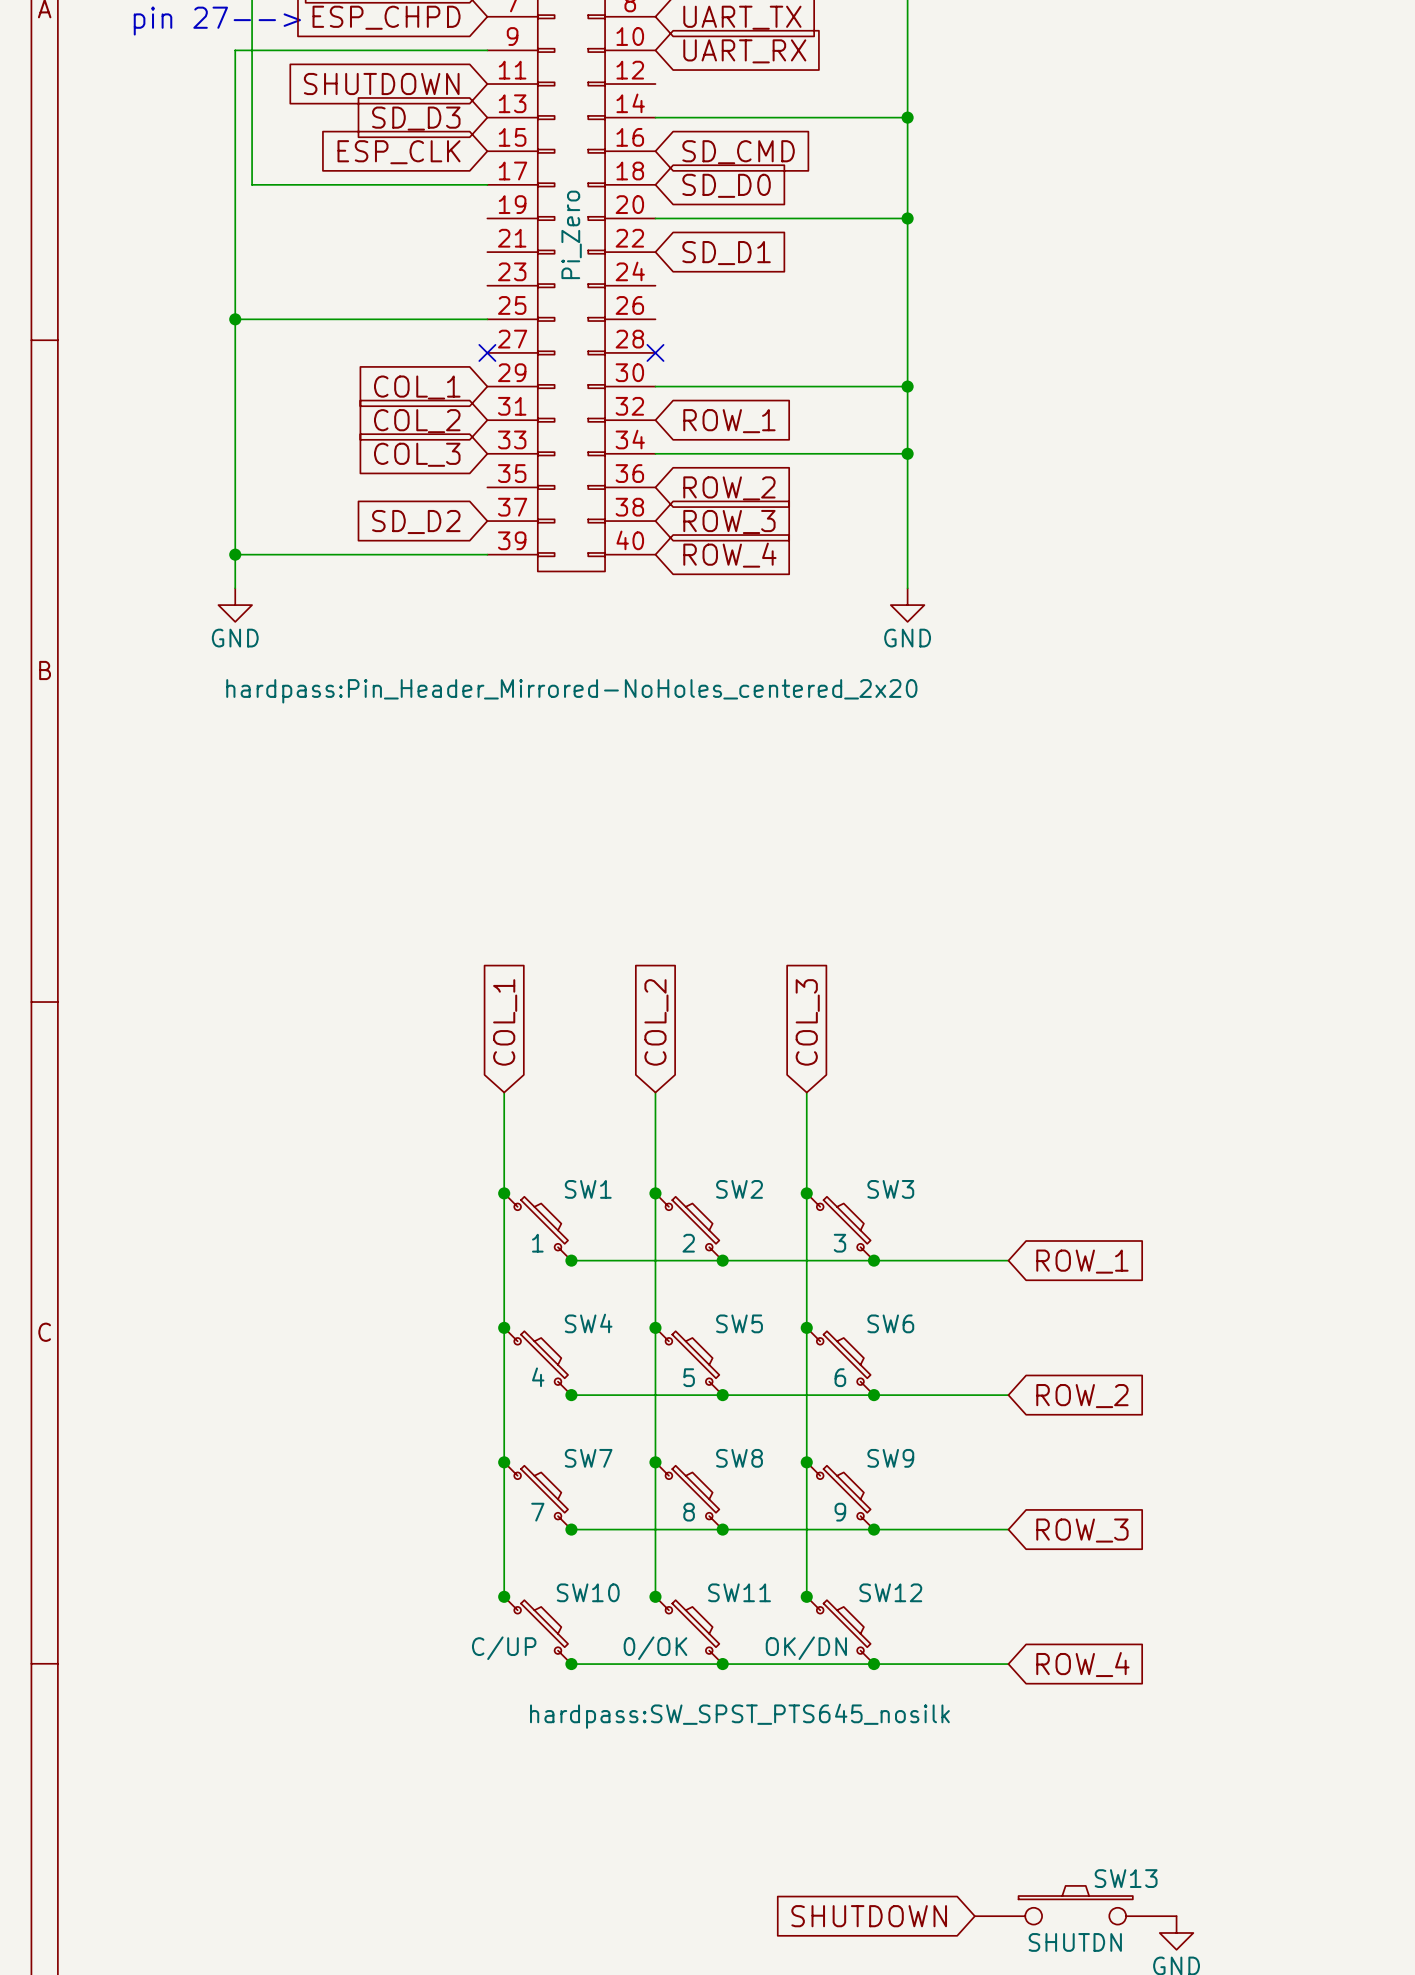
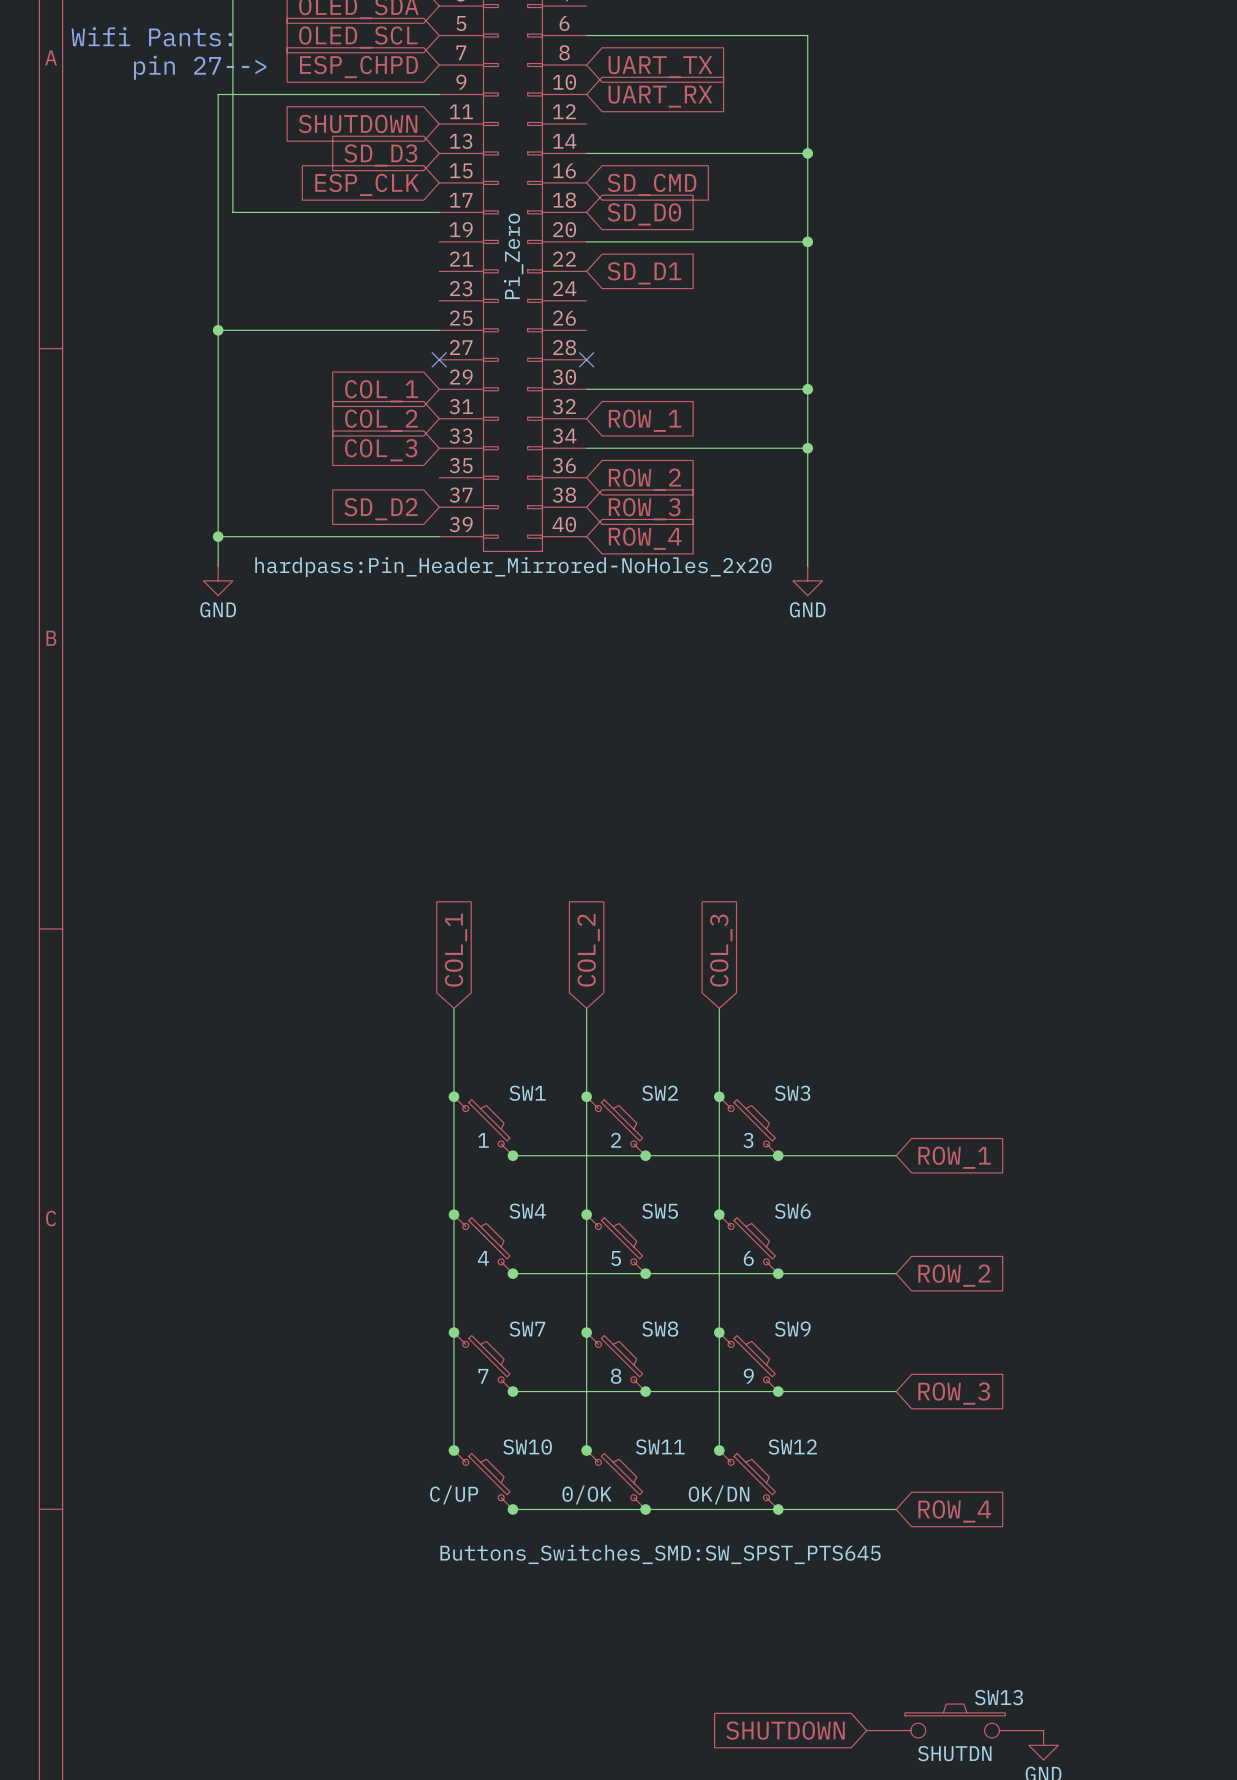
part text: hardpass:Pin_Header_Mirrored-NoHoles_centered_2x20 (571, 691) -> hardpass:Pin_Header_Mirrored-NoHoles_2x20 (513, 567)
SW1 text: hardpass:SW_SPST_PTS645_nosilk (739, 1716) -> Buttons_Switches_SMD:SW_SPST_PTS645 (660, 1554)

